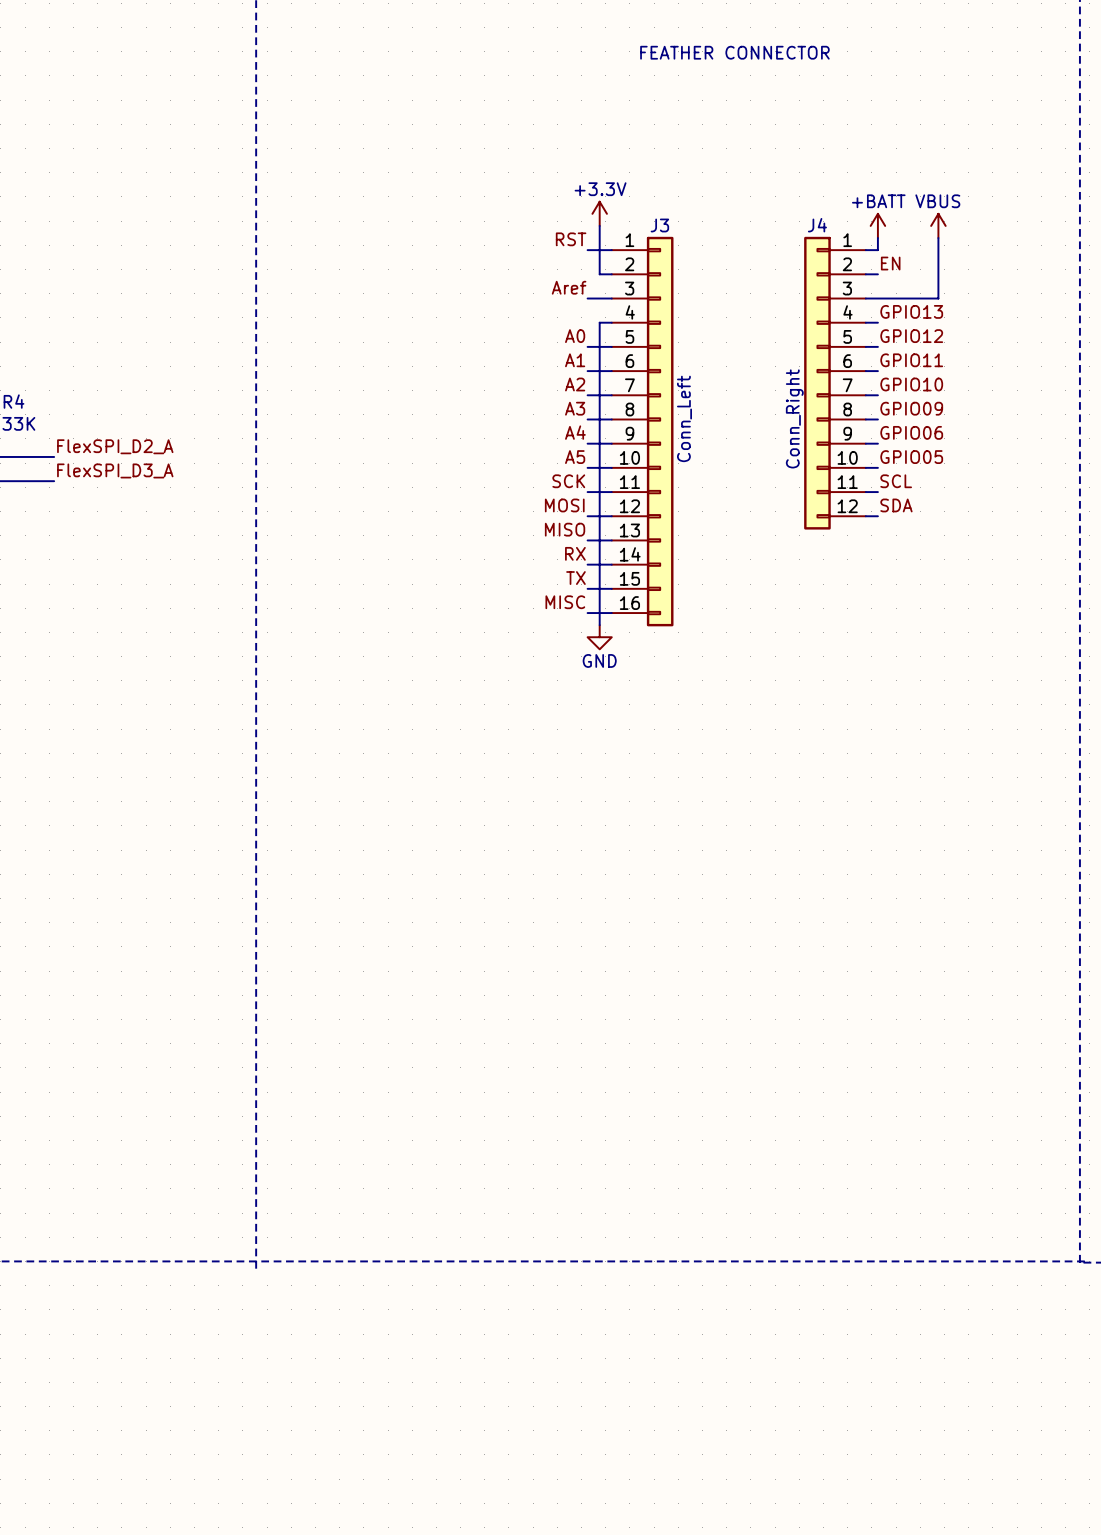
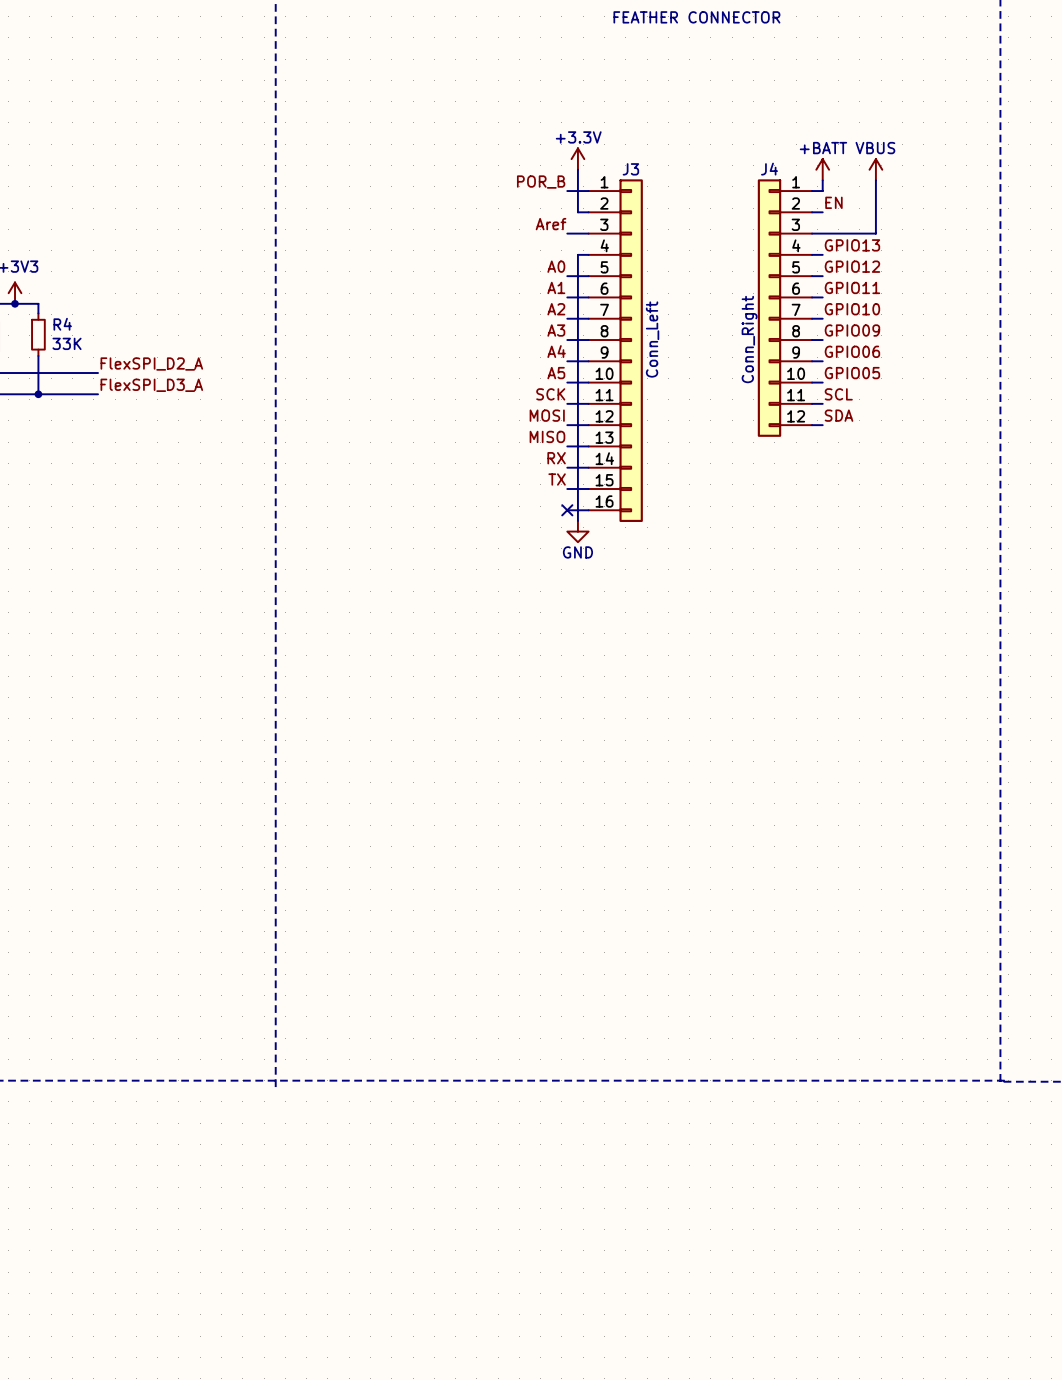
label: RST (571, 239) -> POR_B (541, 182)
label: MISC (565, 602) -> none
no-connect mark: none -> (567, 510)

